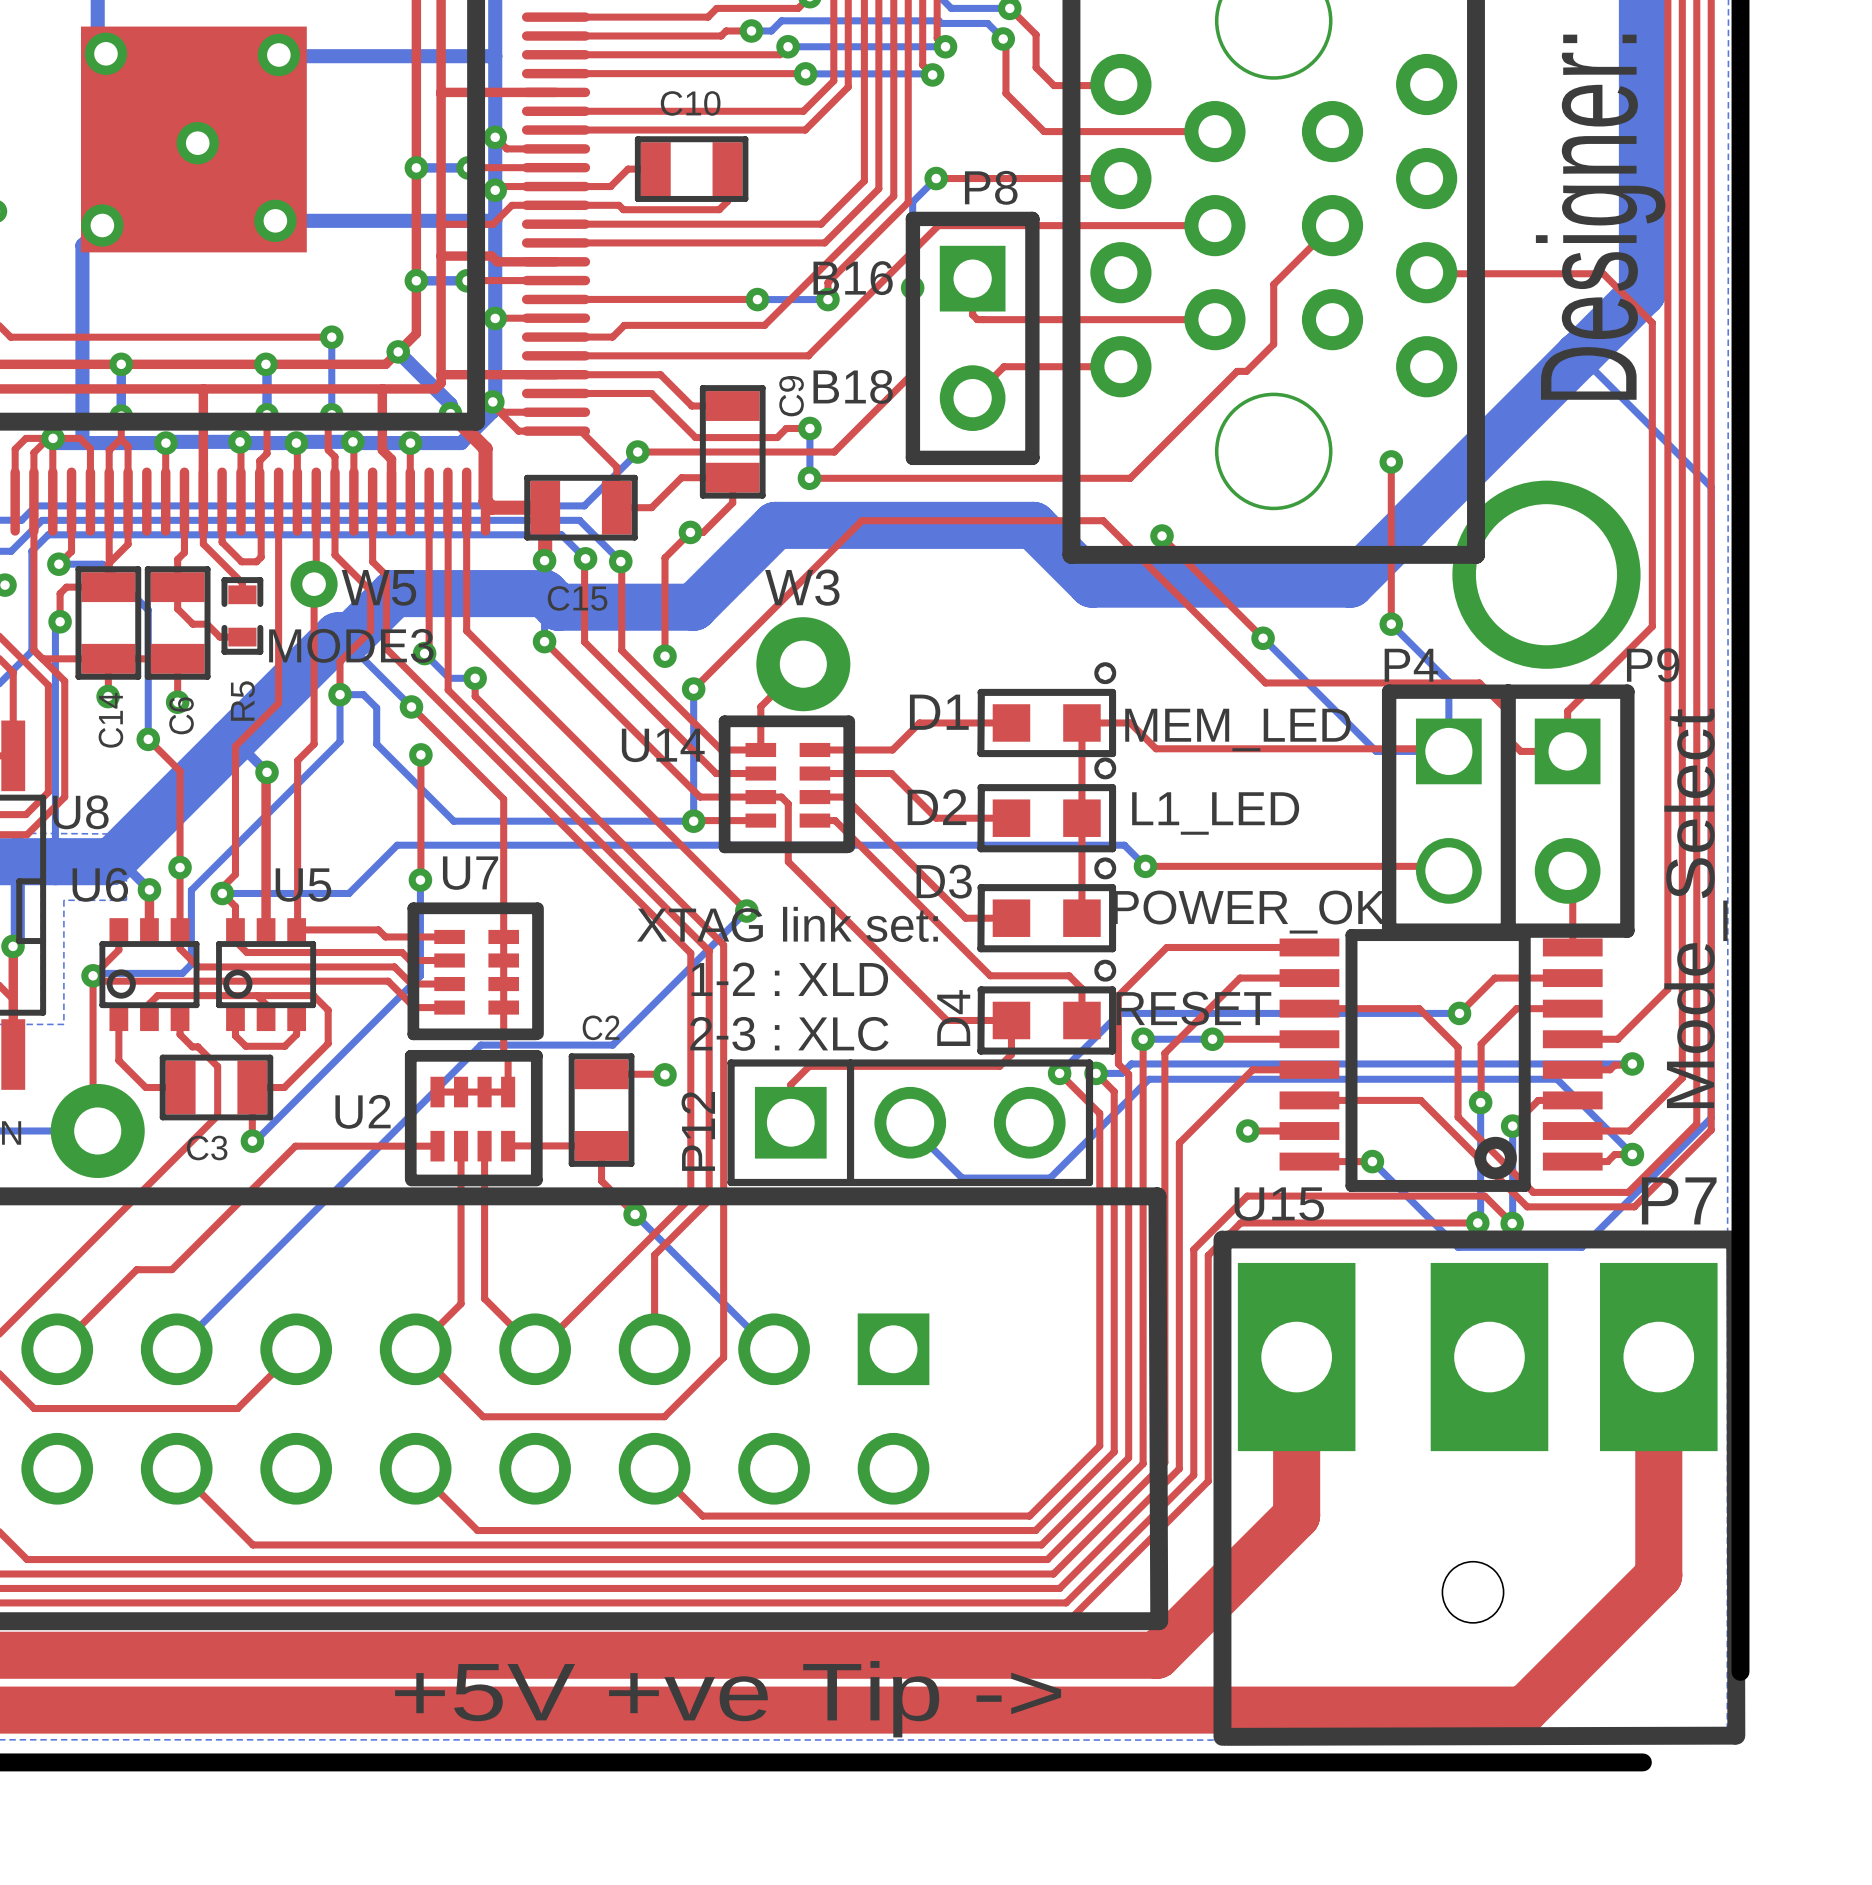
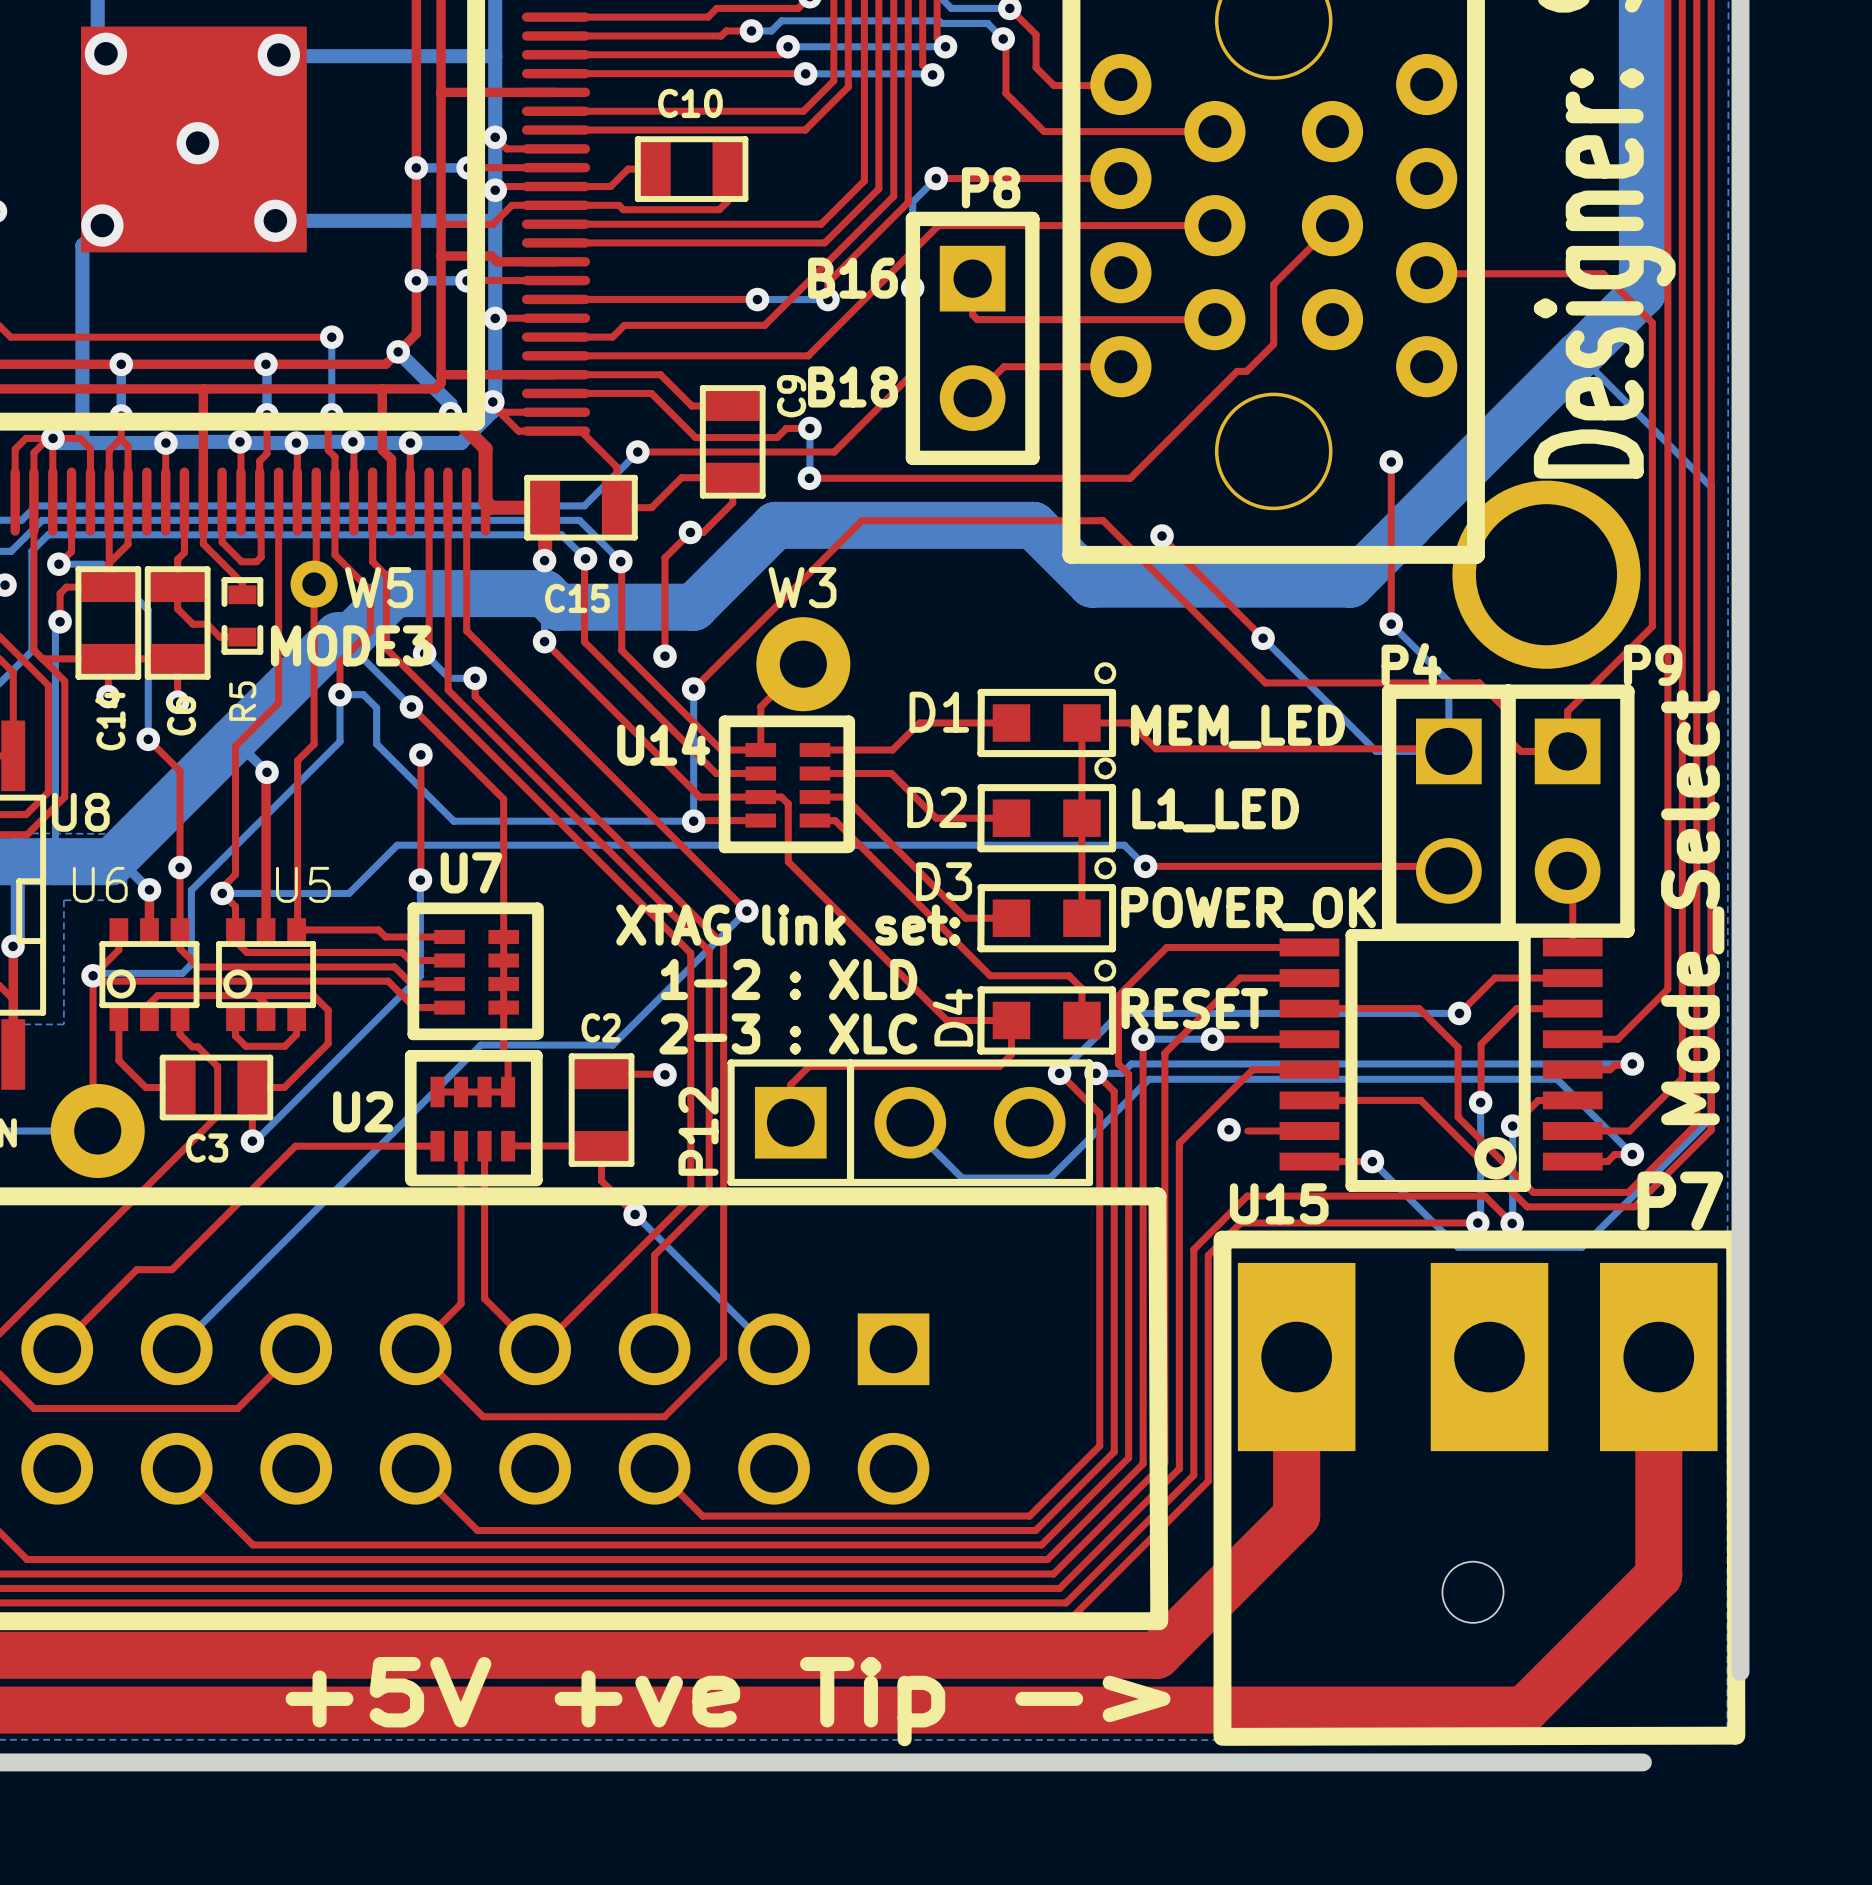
via position: (1247, 1130) -> (1229, 1129)

